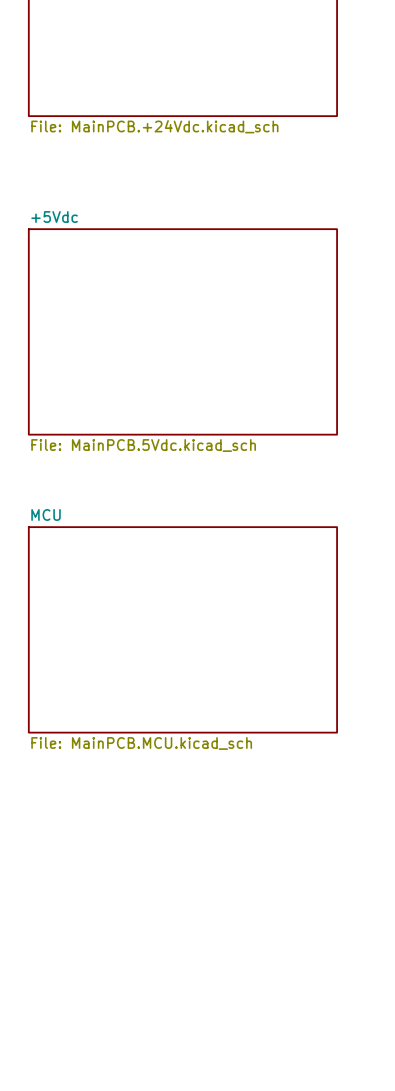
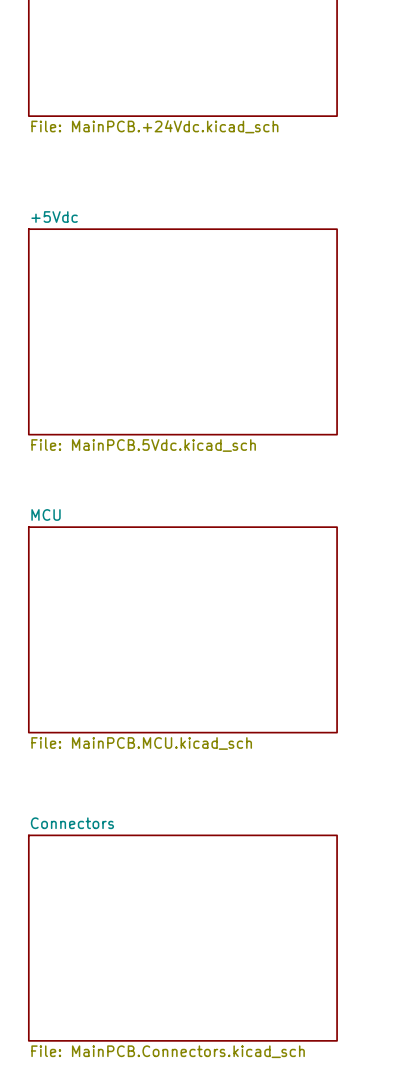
sheet Connectors: none -> File: MainPCB.Connectors.kicad_sch (182, 938)

